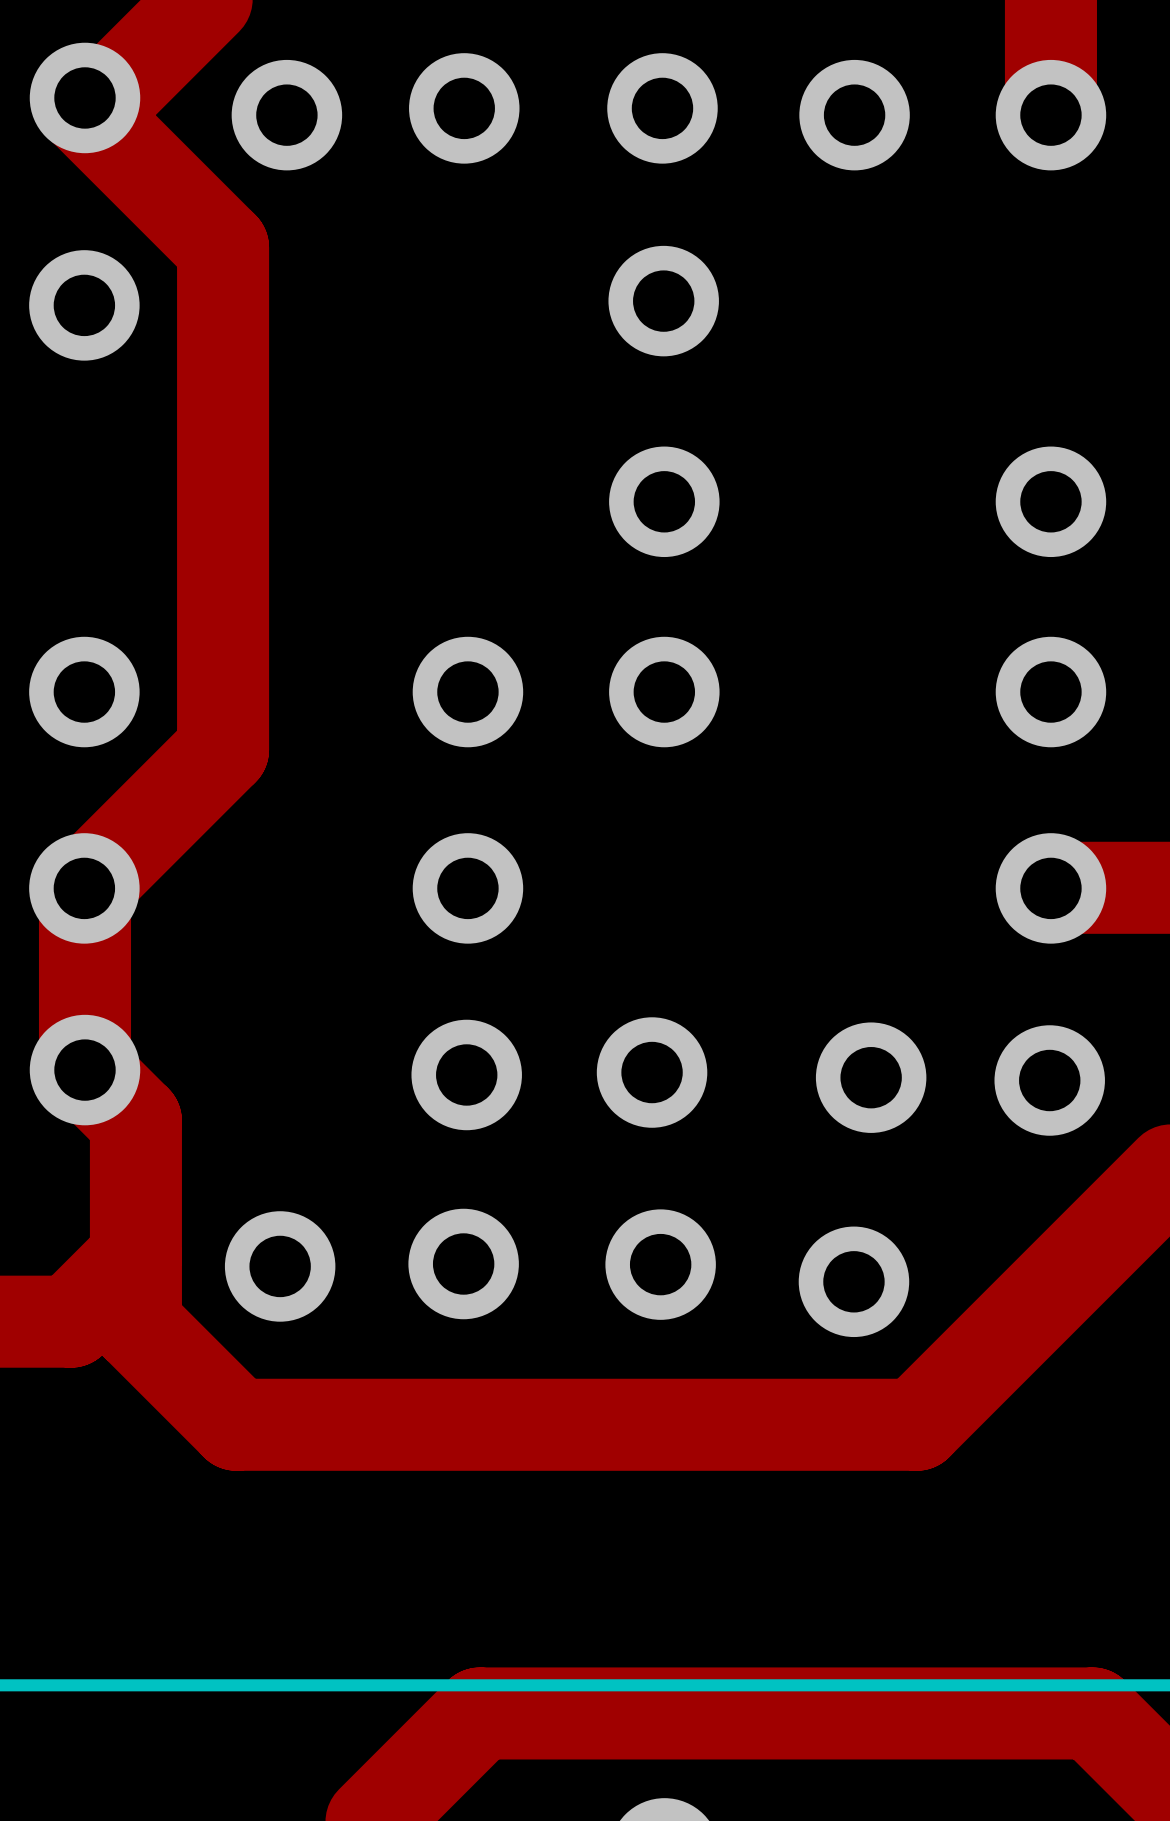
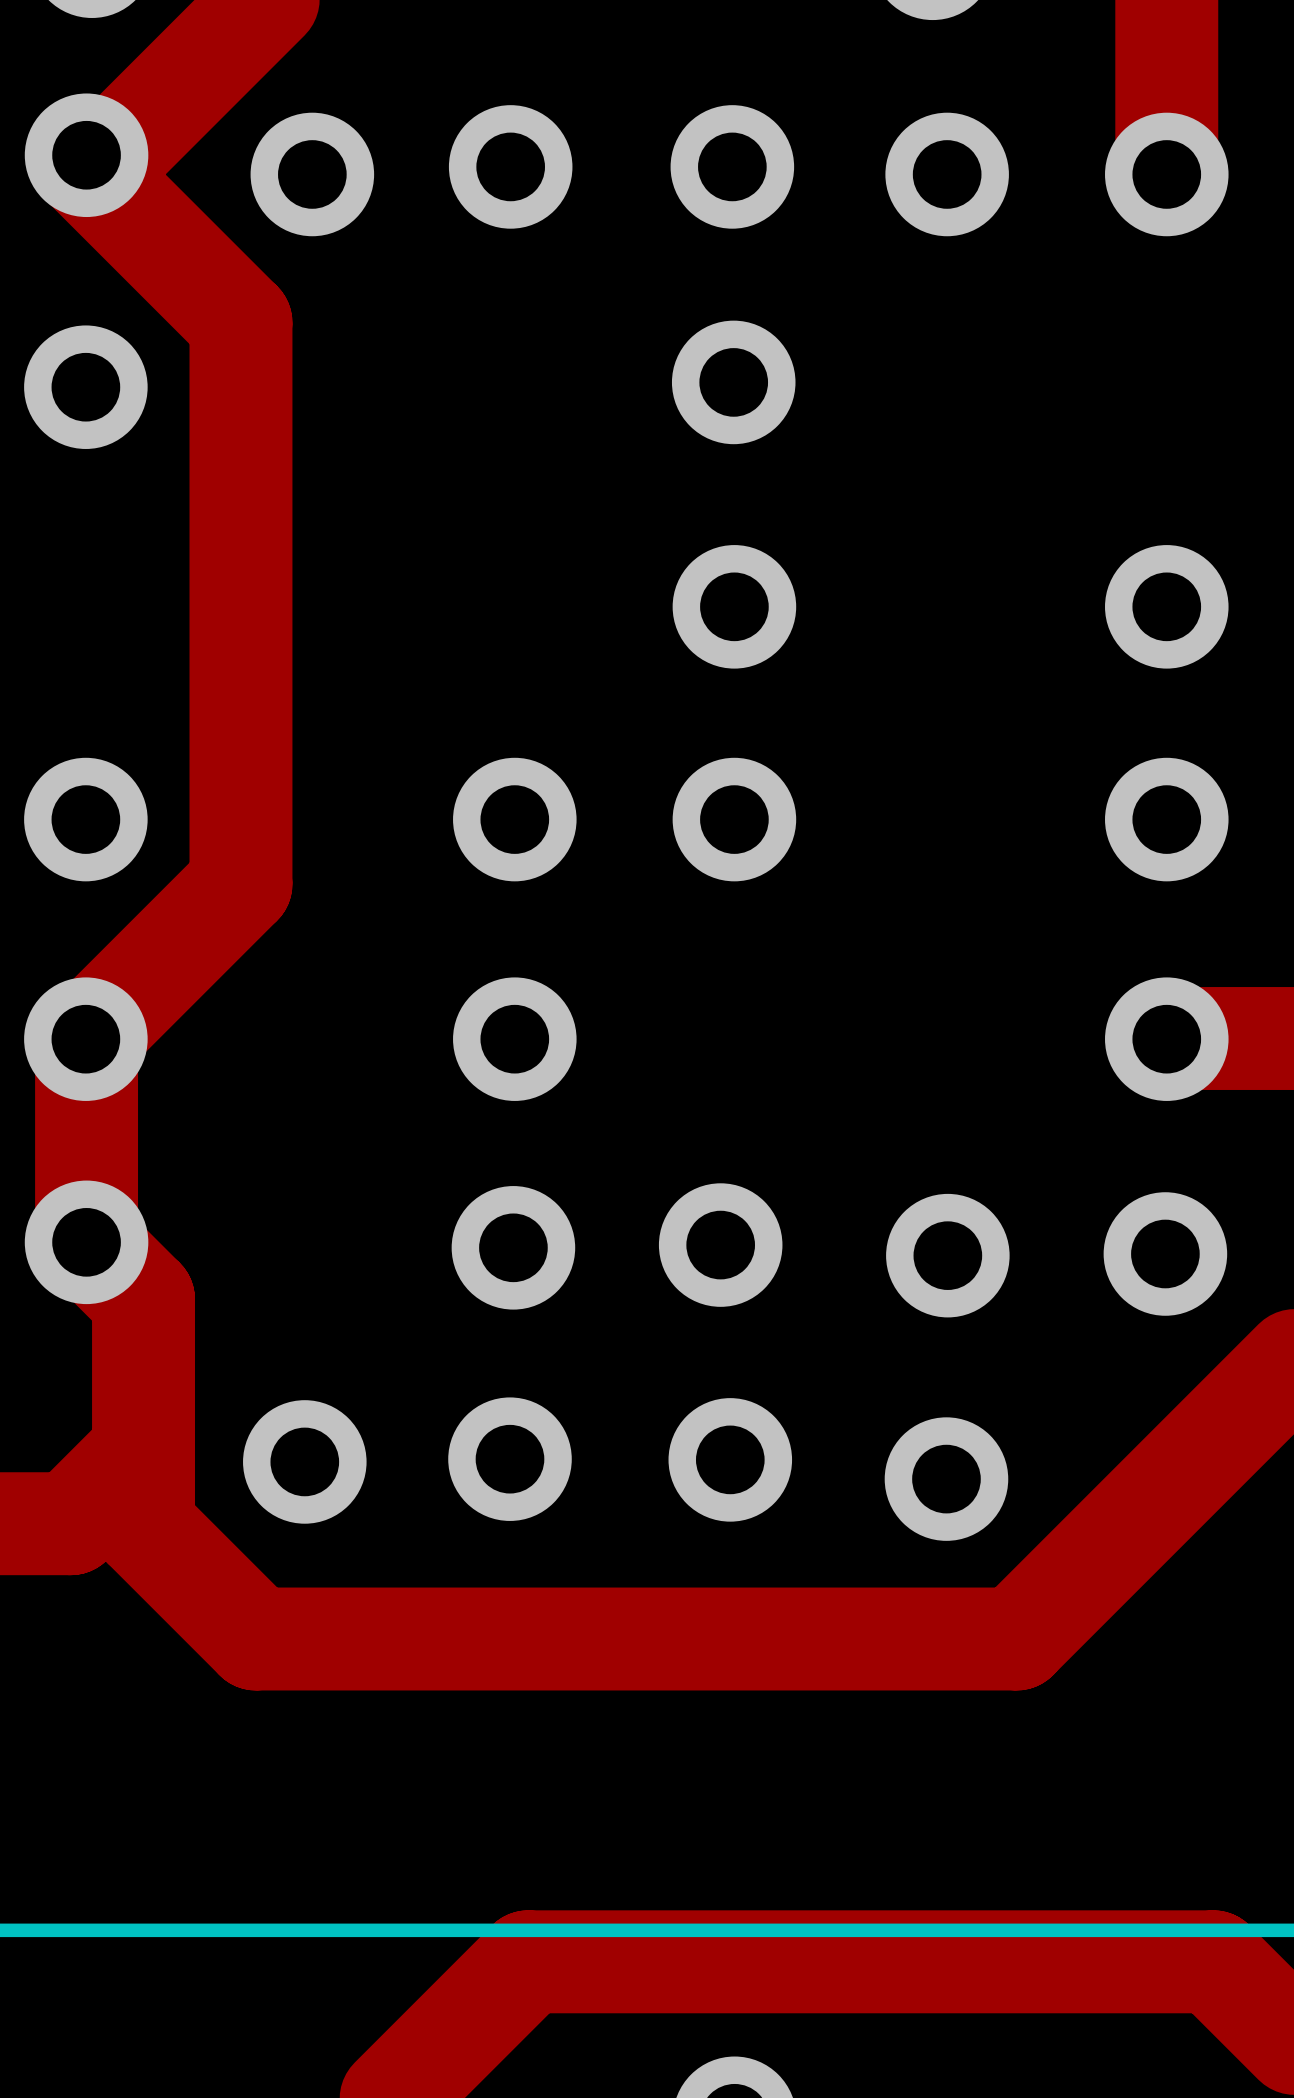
via position: (871, 1077) -> (947, 1255)

